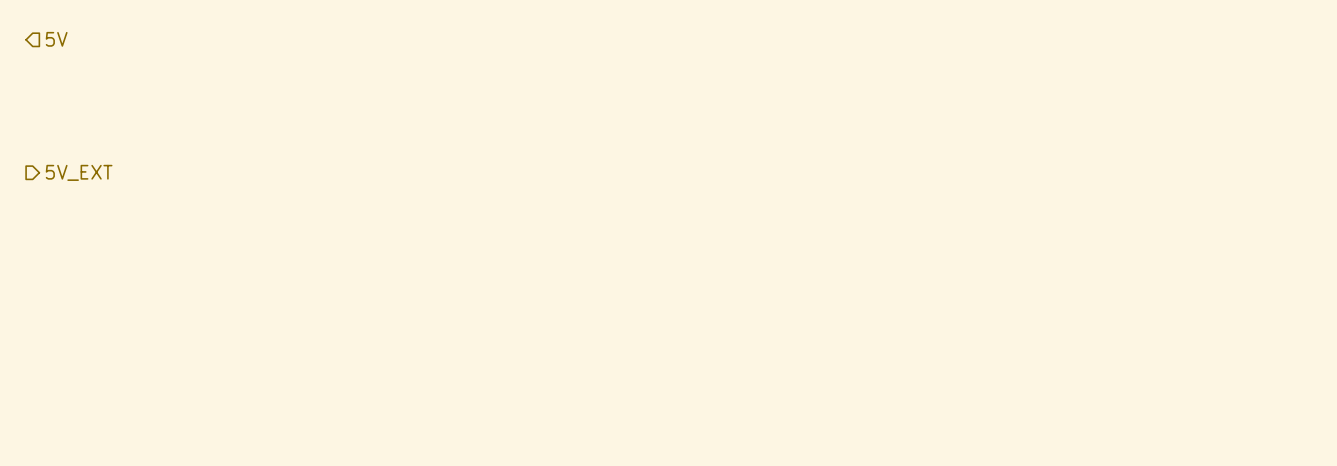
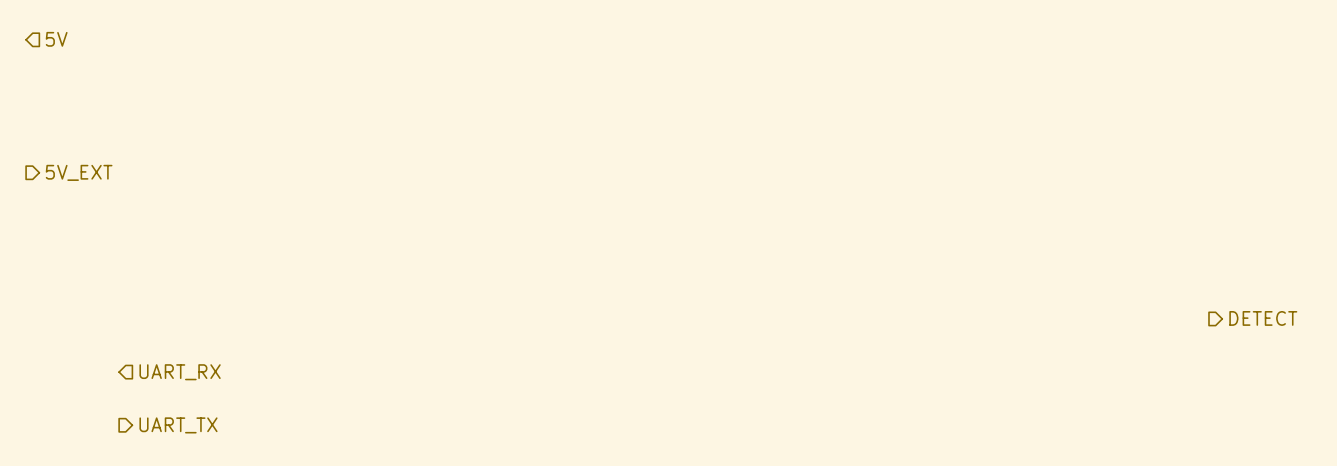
hierarchical label: none -> DETECT (1263, 318)
hierarchical label: none -> UART_RX (180, 372)
hierarchical label: none -> UART_TX (178, 425)

